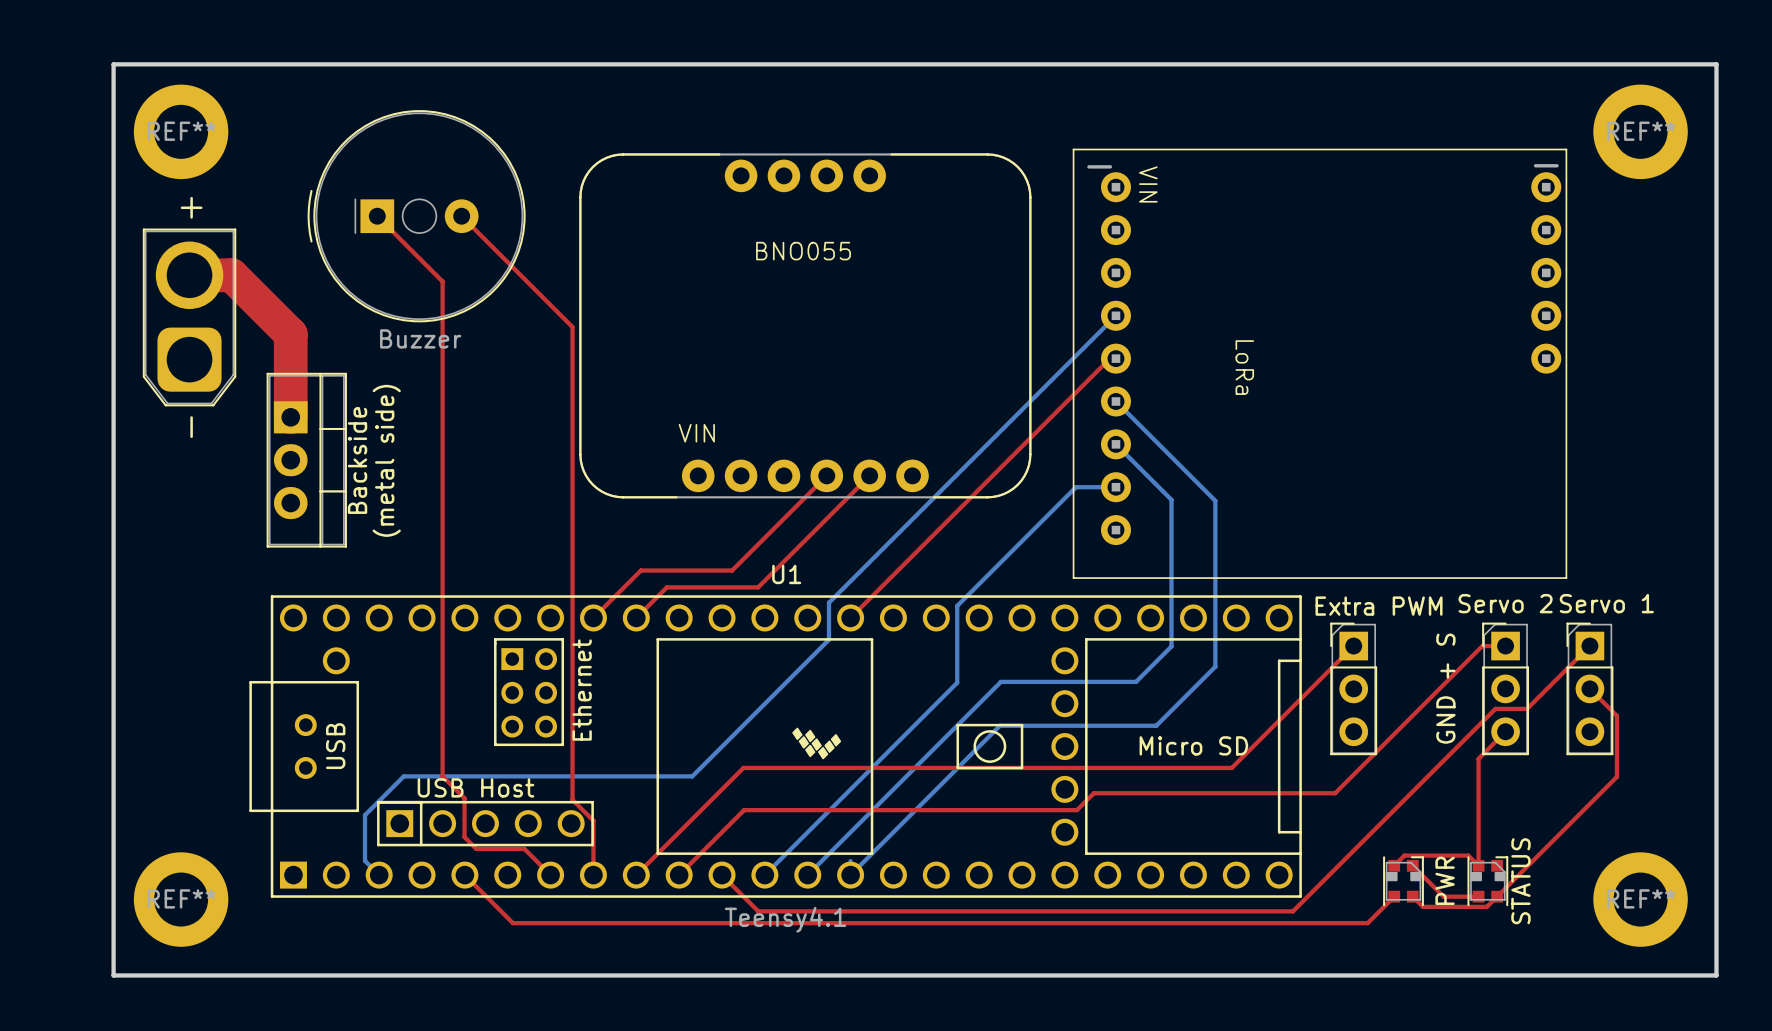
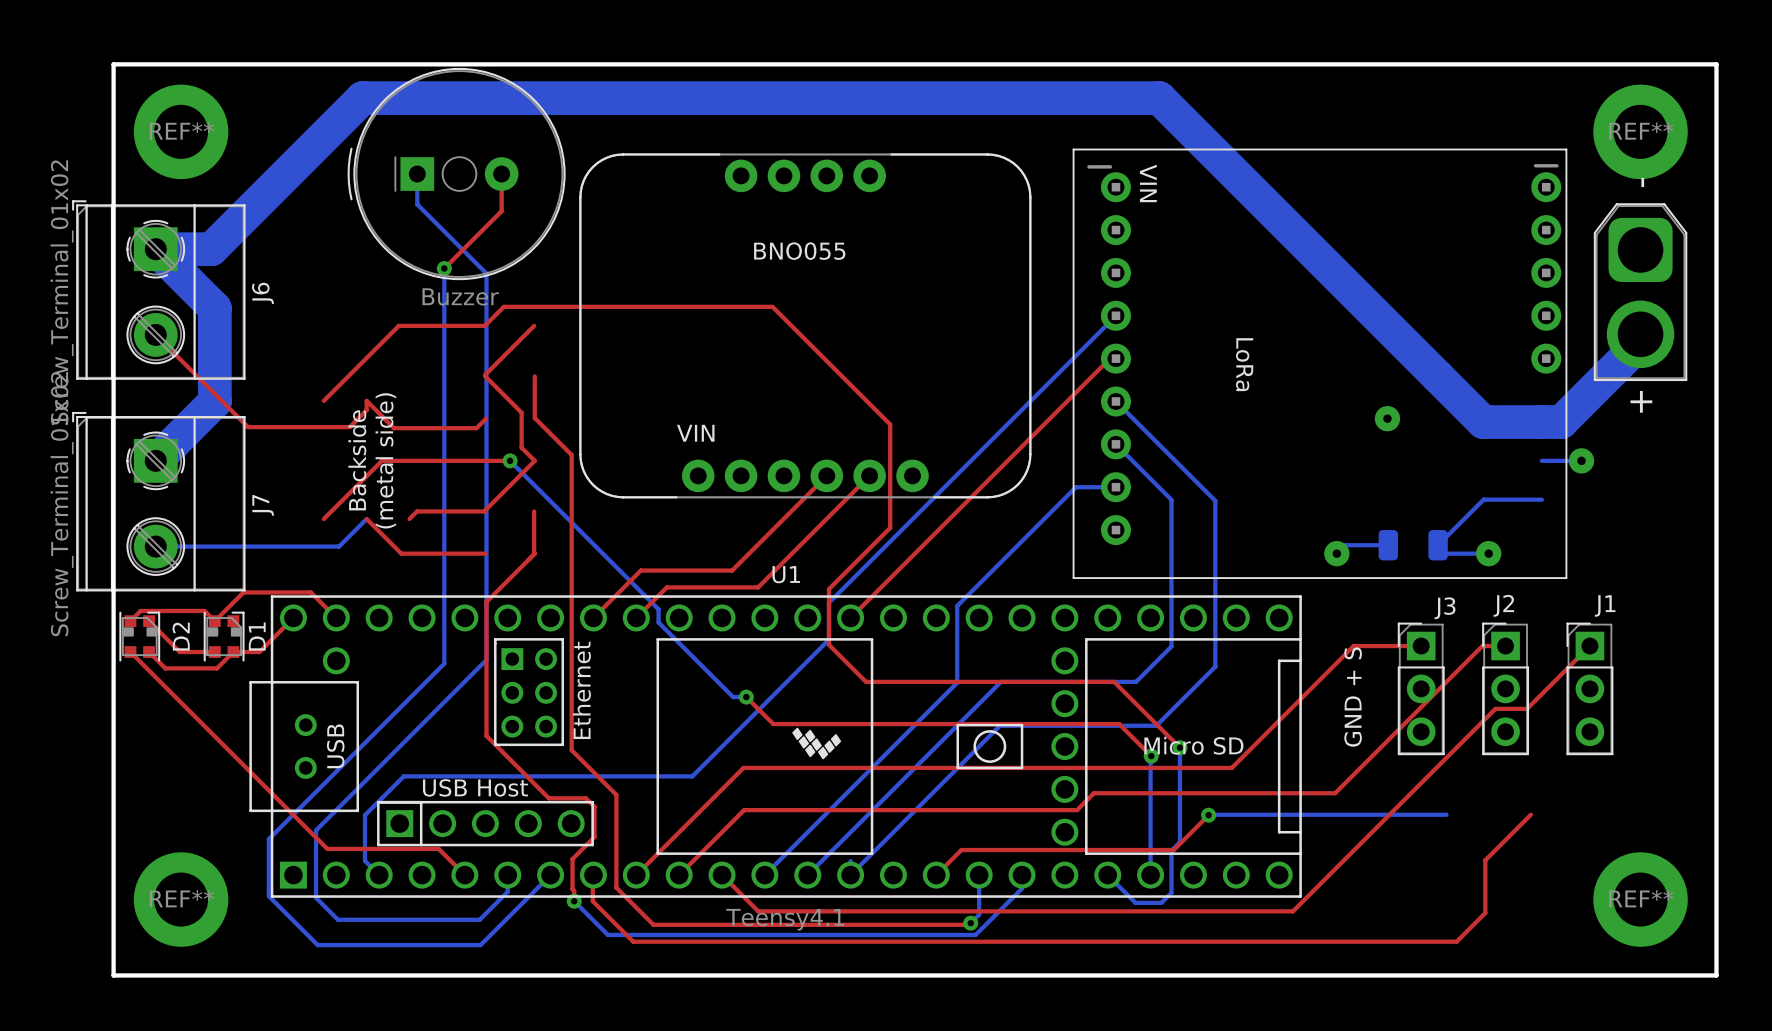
bottom track: none -> (417, 174) (417, 204) (486, 273) (486, 659) (316, 830) (316, 897) (338, 919) (479, 919) (507, 891) (507, 875)
top track: none -> (494, 174) (501, 174) (501, 211) (444, 268)
top track: (377, 216) (442, 281) (442, 776) (464, 798) (464, 837) (476, 848) (524, 848) (550, 875) -> none
part position: (416, 216) -> (456, 174)
top track: (461, 216) (572, 327) (572, 799) (593, 820) (593, 875) -> (1530, 814) (1485, 860) (1485, 913) (1456, 941) (633, 941) (592, 901) (593, 875)
bottom track: none -> (444, 266) (444, 663) (268, 839) (268, 896) (317, 945) (480, 945) (550, 875)
via: none -> (444, 268)
top track: (189, 275) (231, 275) (290, 334) (290, 417) -> none
J6: none -> Screw_Terminal_01x02 (158, 290)
part: none -> (1640, 292)
part: (189, 317) -> none
top track: none -> (534, 325) (485, 376) (521, 412) (521, 447) (534, 460) (484, 511) (417, 511) (409, 518)
top track: none -> (155, 334) (247, 427) (349, 427) (366, 410) (366, 400) (393, 428) (476, 428) (486, 418)
bottom track: none -> (1640, 334) (1640, 342) (1561, 422) (1483, 422) (1159, 98) (362, 98) (211, 249) (155, 249) (214, 308) (214, 401) (155, 460)
top track: none -> (534, 376) (534, 418) (571, 454) (571, 750) (616, 794) (616, 887) (653, 924) (969, 924) (970, 923)
top track: none -> (323, 400) (398, 325) (484, 325) (503, 306) (772, 306) (890, 424) (890, 527) (828, 589) (828, 644) (866, 681) (1114, 681) (1179, 747)
via: none -> (1387, 418)
part: (306, 460) -> none
top track: none -> (510, 460) (381, 460) (323, 518)
bottom track: none -> (510, 460) (658, 609) (658, 622) (733, 697) (746, 697)
via: none -> (510, 460)
bottom track: none -> (1541, 460) (1581, 460)
via: none -> (1581, 460)
bottom track: none -> (1541, 499) (1483, 499) (1438, 545) (1446, 553) (1488, 553)
J7: none -> Screw_Terminal_01x02 (158, 501)
top track: none -> (534, 511) (534, 553) (486, 601) (486, 735) (548, 798) (586, 798) (594, 806) (594, 837) (572, 859) (574, 901)
top track: none -> (366, 518) (401, 553) (485, 553)
bottom track: none -> (366, 518) (339, 546) (155, 546)
bottom track: none -> (1388, 545) (1345, 545) (1336, 553)
part: none -> (1413, 545)
via: none -> (1336, 553)
via: none -> (1488, 553)
Servo 2 name: Servo 2 (1505, 603) -> J2 (1503, 605)
Servo 1 name: Servo 1 (1606, 603) -> J1 (1605, 605)
top track: none -> (293, 617) (259, 652) (233, 652) (217, 668) (165, 668) (149, 652)
top track: none -> (336, 617) (310, 592) (243, 592) (214, 621) (204, 610) (140, 610) (130, 621)
top track: none -> (149, 621) (179, 652) (214, 652)
D2: none -> (139, 636)
D1: none -> (224, 636)
top track: none -> (1353, 646) (1421, 646)
Extra PWM: (1353, 688) -> none
J3: none -> (1421, 688)
text position: GND + S (1445, 688) -> GND + S (1353, 697)
top track: (1589, 688) (1616, 715) (1616, 776) (1486, 906) (1422, 906) (1412, 896) -> none
top track: none -> (746, 697) (773, 724) (1119, 724) (1151, 756)
via: none -> (746, 697)
top track: (1505, 731) (1478, 758) (1478, 865) (1468, 855) (1404, 855) (1394, 865) -> none
bottom track: none -> (1179, 747) (1179, 842) (1171, 850) (1171, 892) (1161, 902) (1135, 902) (1107, 875)
via: none -> (1179, 747)
bottom track: none -> (1151, 756) (1150, 875)
via: none -> (1151, 756)
bottom track: none -> (1208, 814) (1446, 814)
top track: none -> (1208, 815) (1173, 850) (961, 850) (936, 875)
via: none -> (1208, 815)
top track: (1412, 865) (1443, 896) (1478, 896) -> none
top track: (464, 875) (512, 923) (1367, 923) (1394, 896) -> (464, 875) (438, 848) (327, 848) (130, 652)
bottom track: none -> (979, 875) (979, 914) (970, 923)
bottom track: none -> (1022, 875) (1022, 888) (975, 934) (607, 934) (574, 901)
PWR: (1403, 881) -> none
STATUS: (1487, 881) -> none
via: none -> (574, 901)
via: none -> (970, 923)

